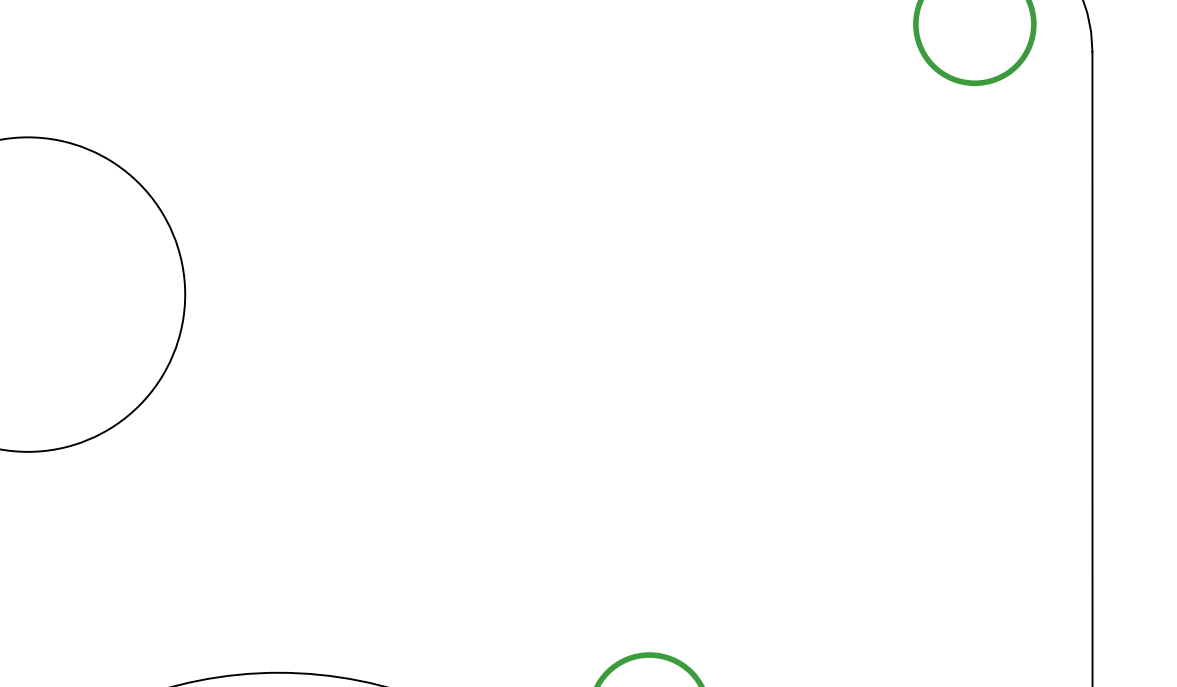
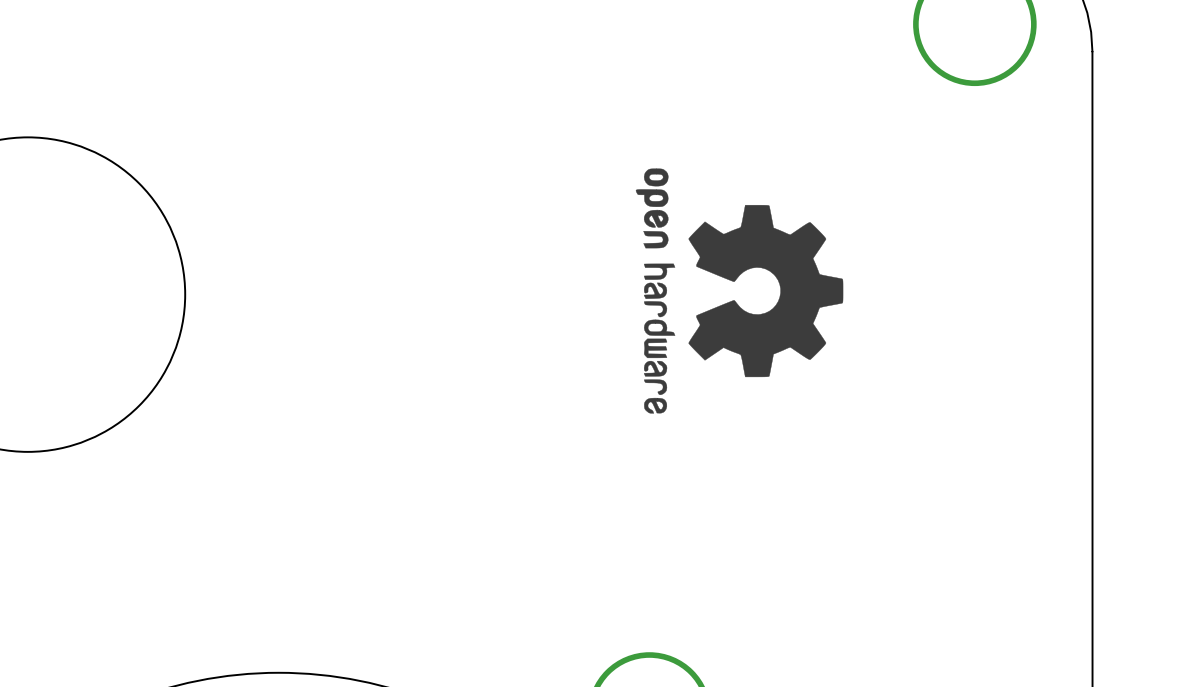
drawing: none -> [635, 168, 844, 414]

